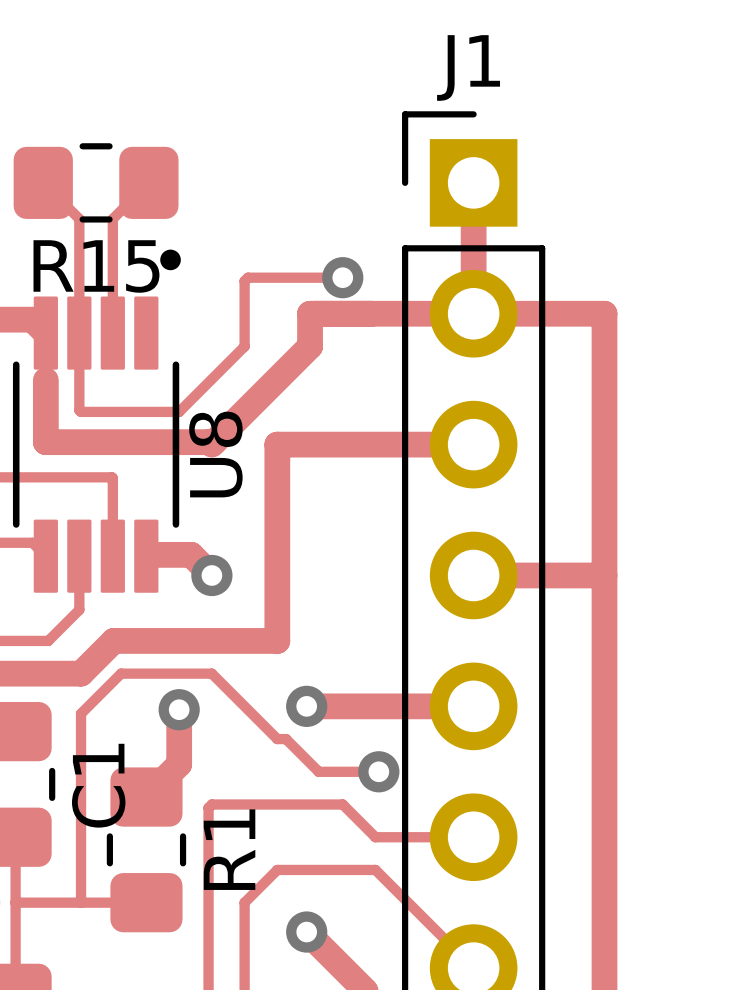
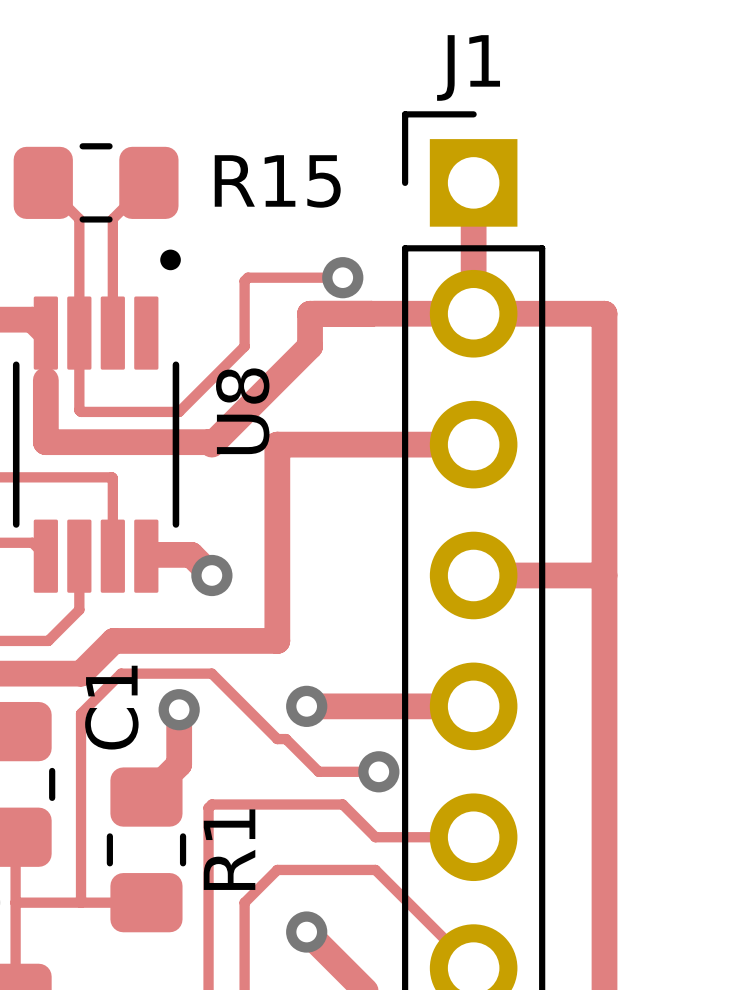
R15 name position: R15 (96, 266) -> R15 (277, 181)
U8 name position: U8 (215, 454) -> U8 (242, 411)
C1 name position: C1 (98, 785) -> C1 (111, 707)

